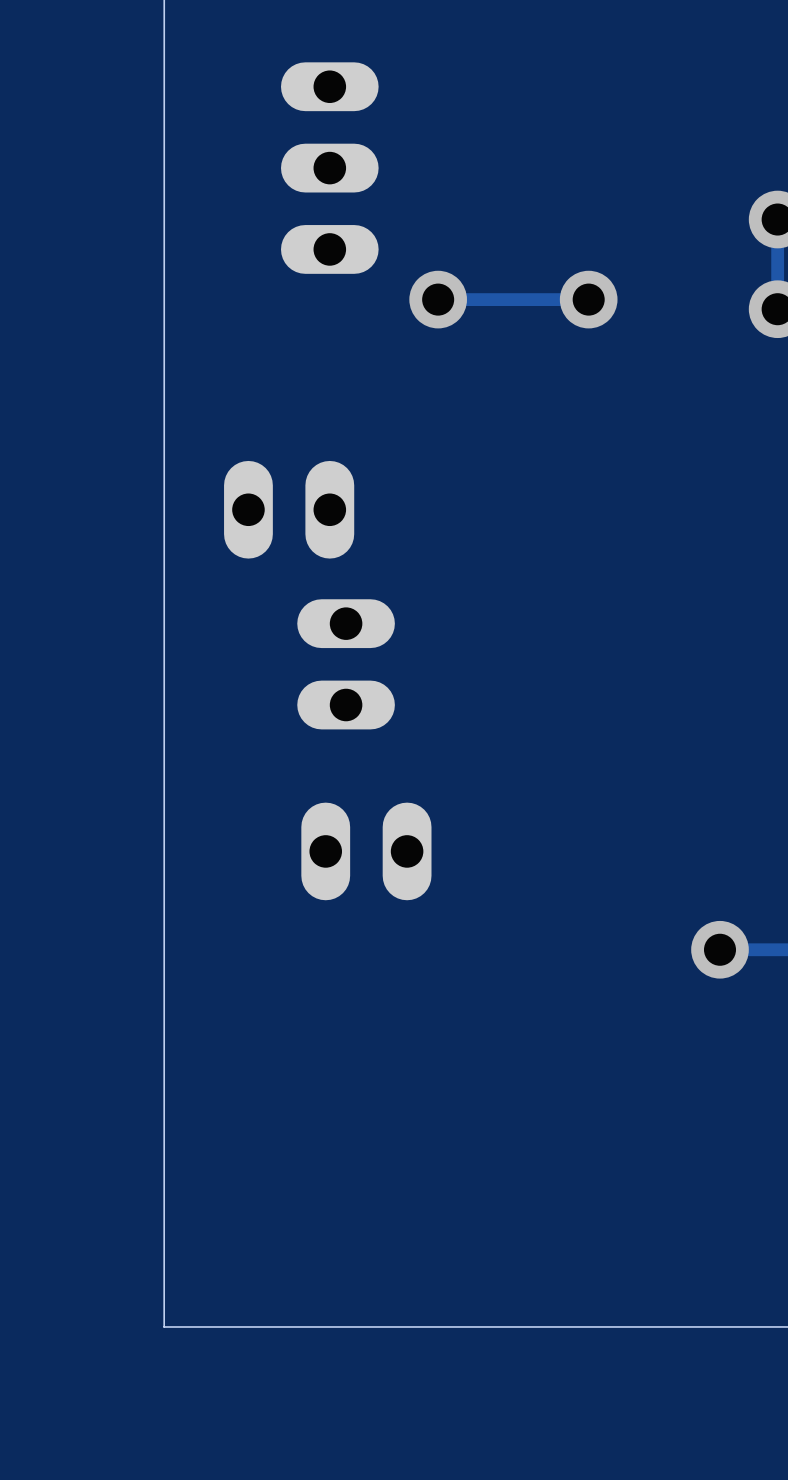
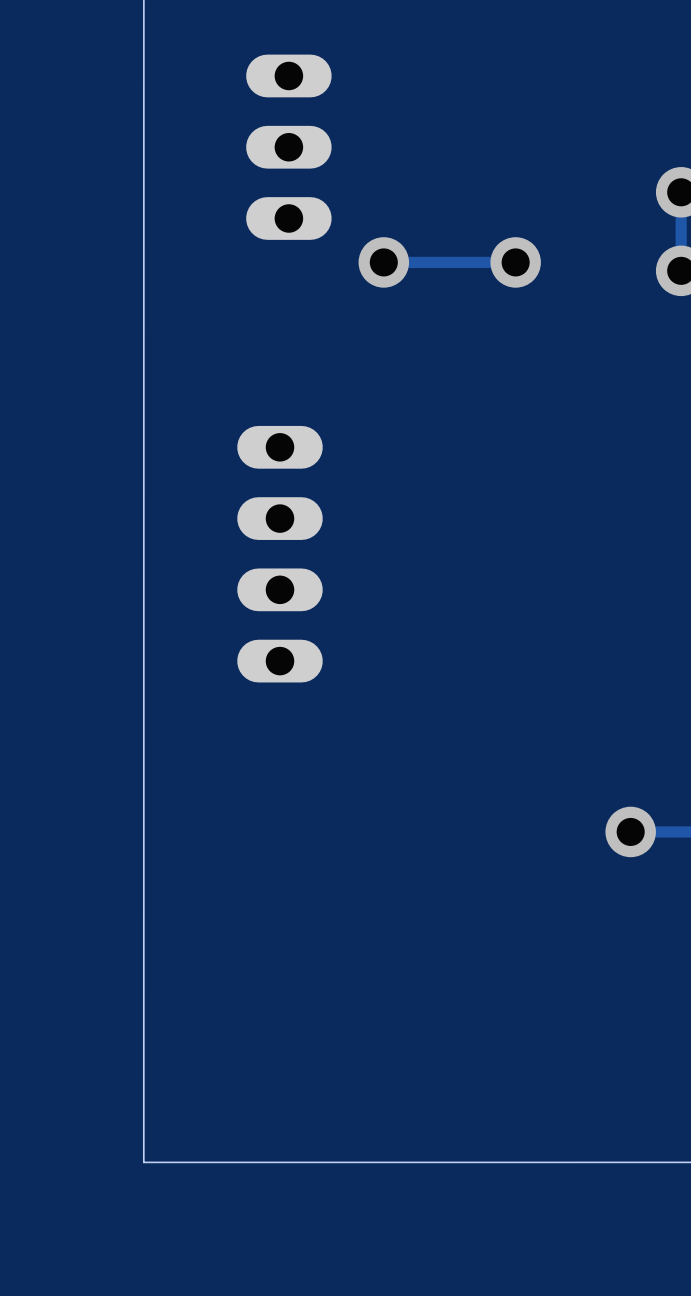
part: (289, 509) -> none
part: none -> (280, 554)
part: (346, 664) -> none
part: (366, 851) -> none

